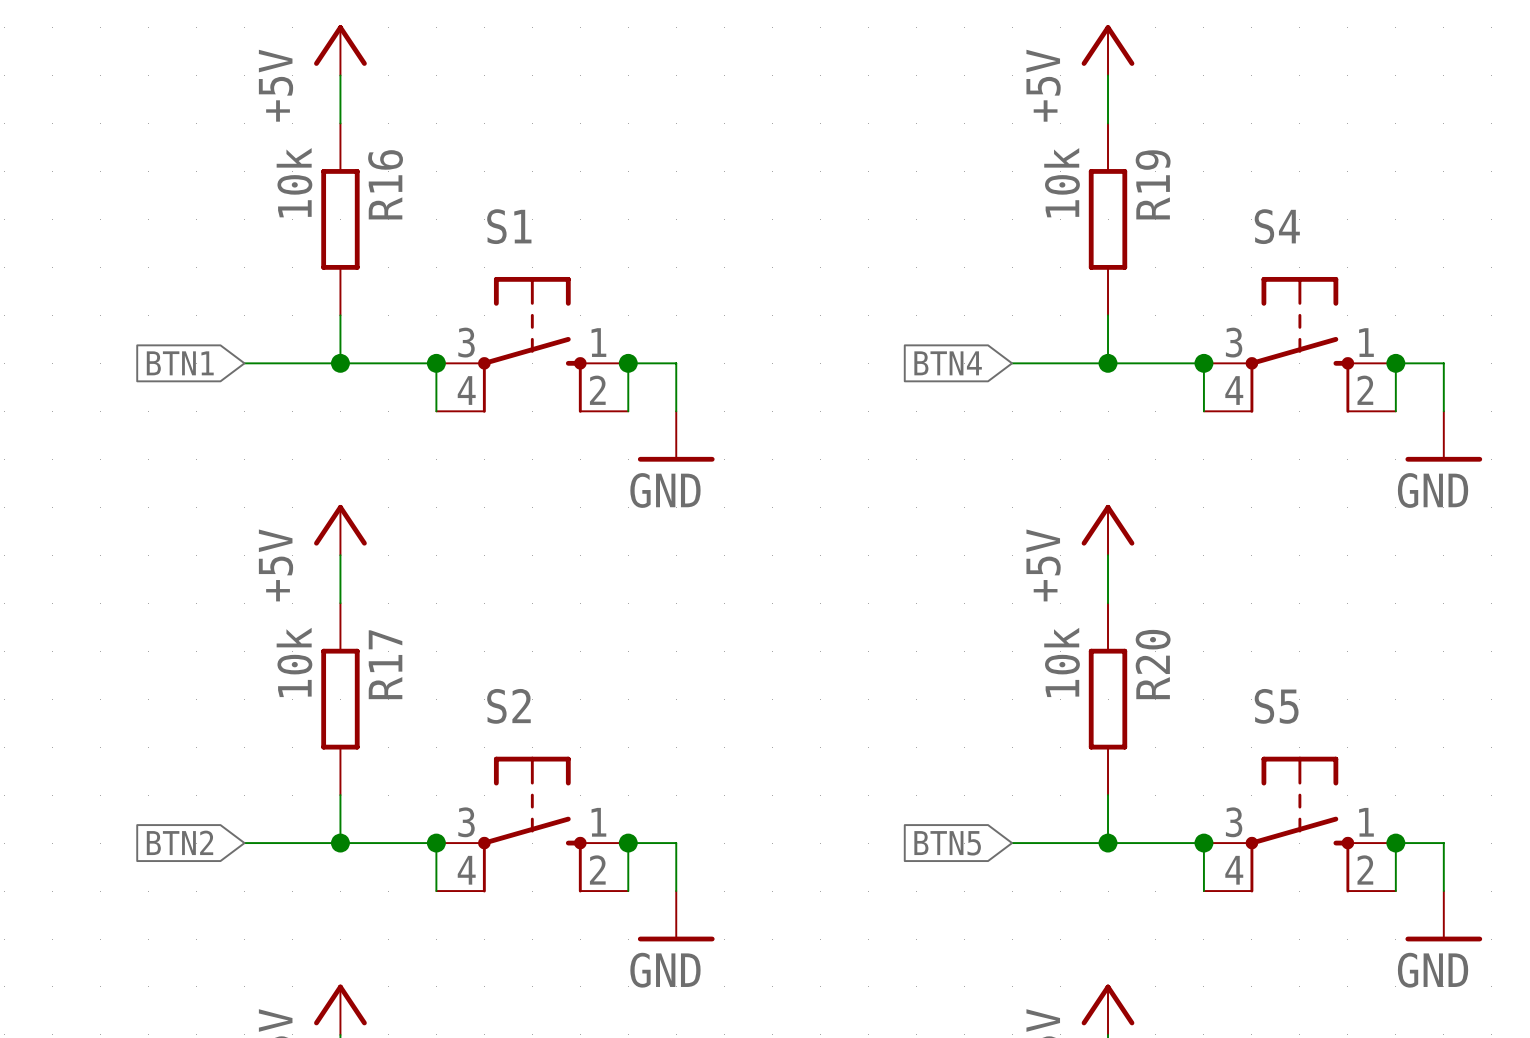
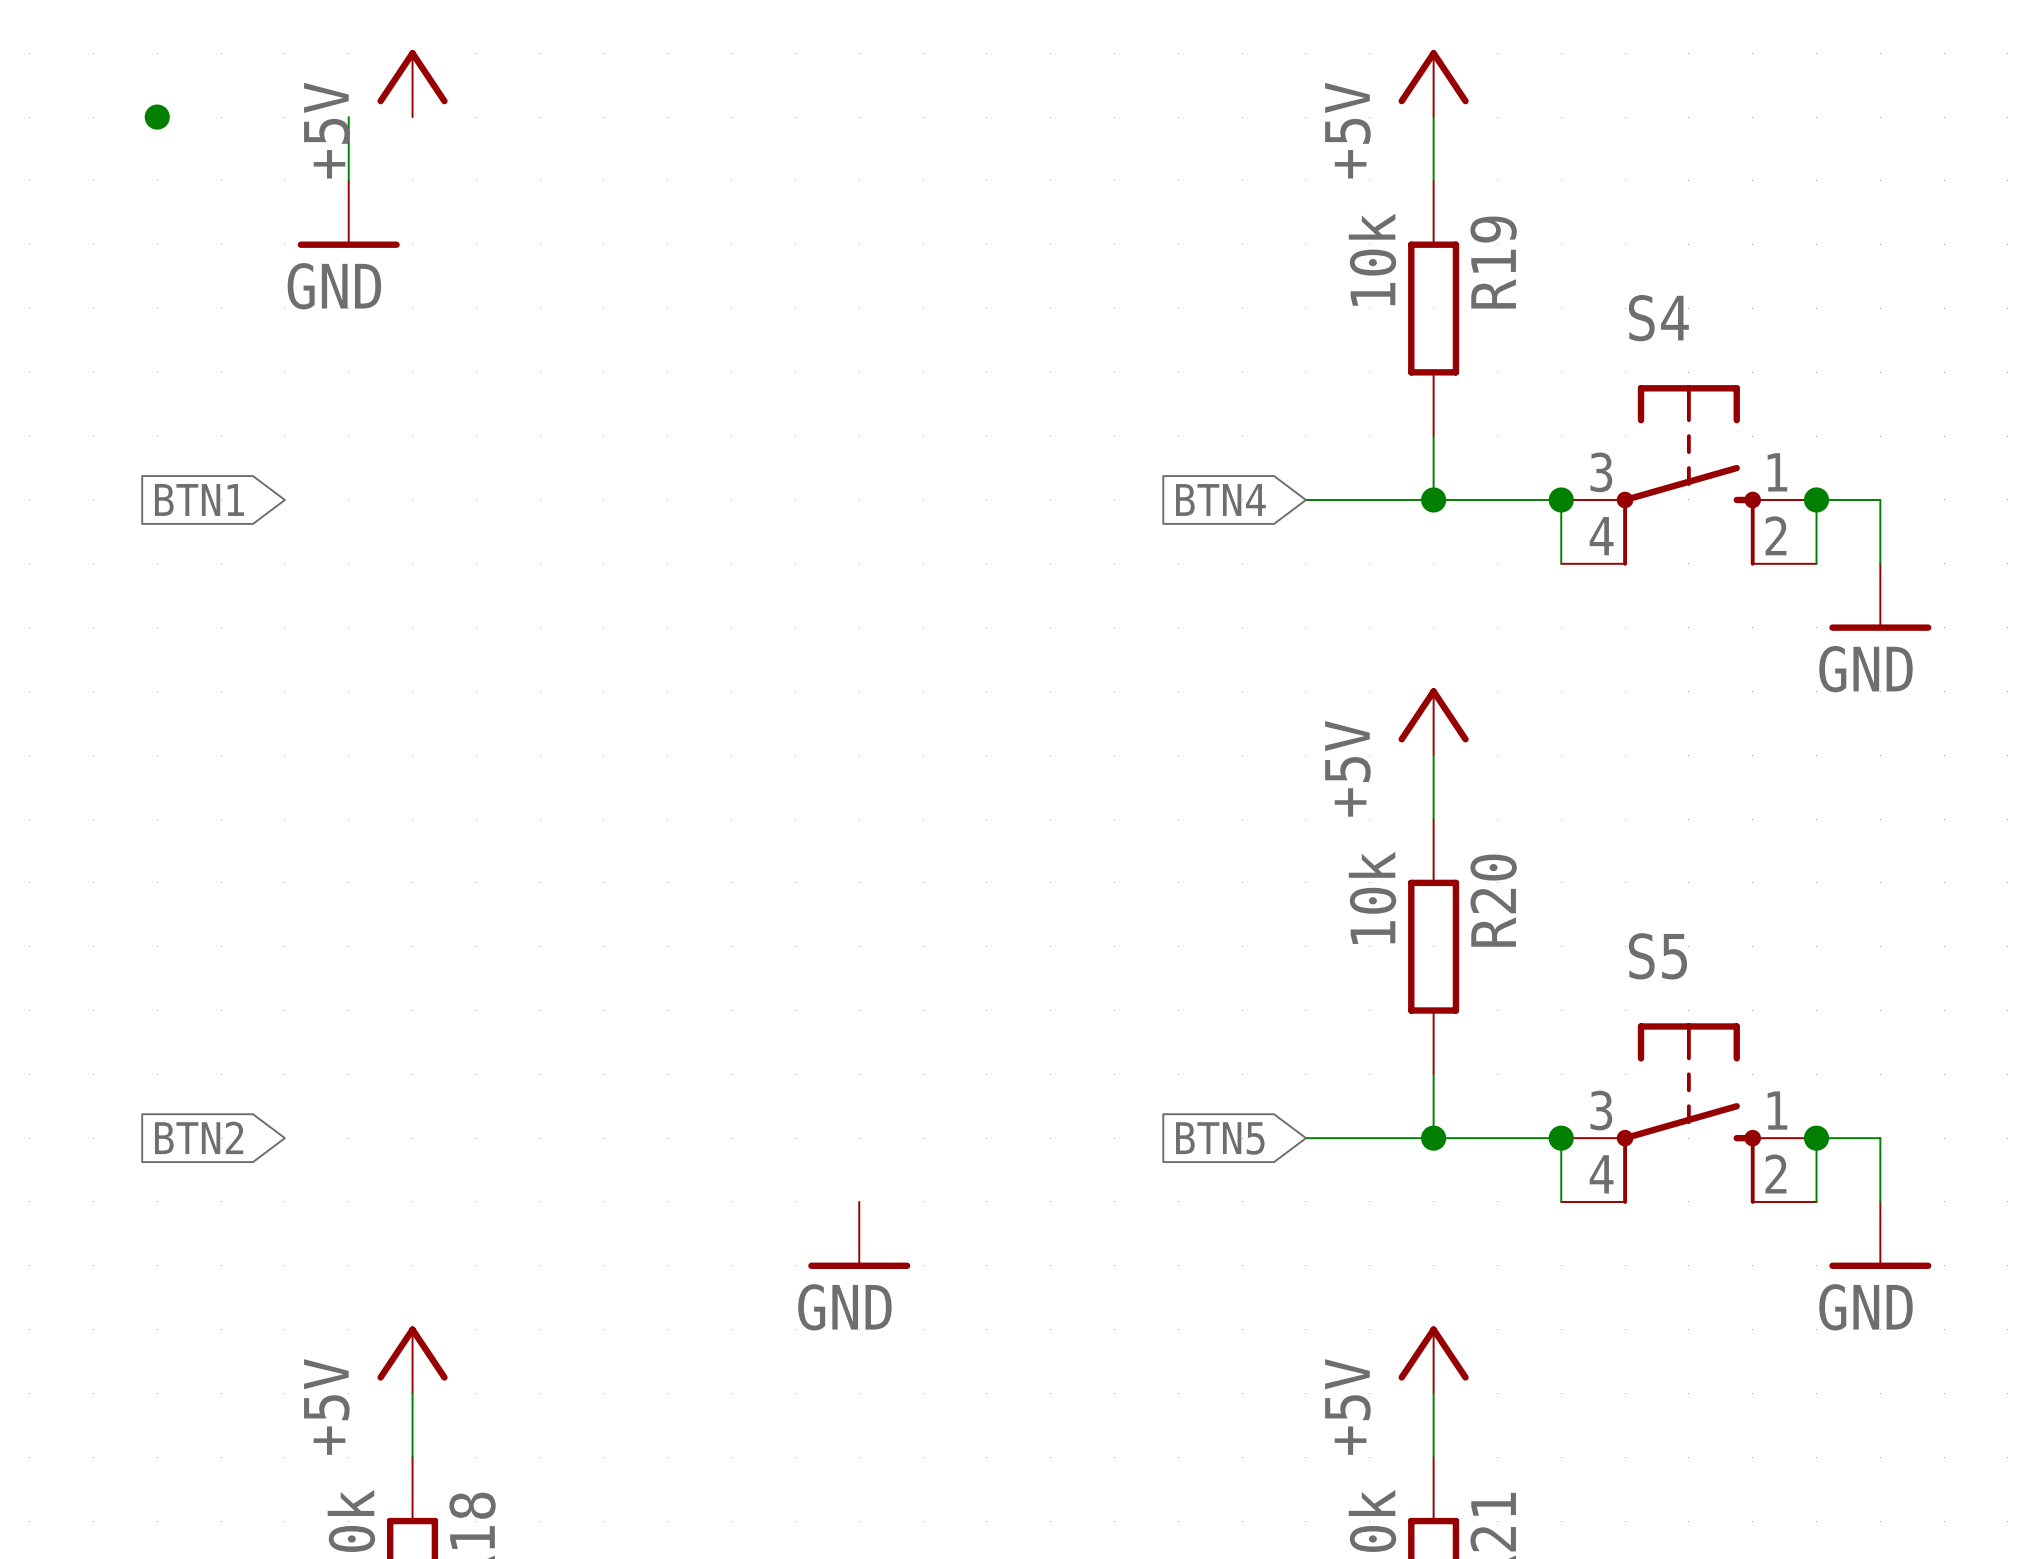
junction: none -> (157, 117)
wire: (340, 75) (340, 123) -> (348, 117) (348, 180)
power symbol: none -> GND (348, 214)
R16: 10k (340, 219) -> none
wire: (340, 315) (340, 363) -> none
S1: (532, 344) -> none
wire: (244, 363) (436, 363) (436, 411) -> none
junction: (340, 363) -> none
junction: (436, 363) -> none
junction: (628, 363) -> none
wire: (628, 411) (628, 363) (676, 363) (676, 411) -> none
power symbol: GND (676, 436) -> none
power symbol: +5V (340, 530) -> none
wire: (340, 555) (340, 603) -> none
R17: 10k (340, 699) -> none
wire: (340, 795) (340, 843) -> none
S2: (532, 824) -> none
wire: (244, 843) (436, 843) (436, 891) -> none
junction: (340, 843) -> none
junction: (436, 843) -> none
junction: (628, 843) -> none
wire: (628, 891) (628, 843) (676, 843) (676, 891) -> none

